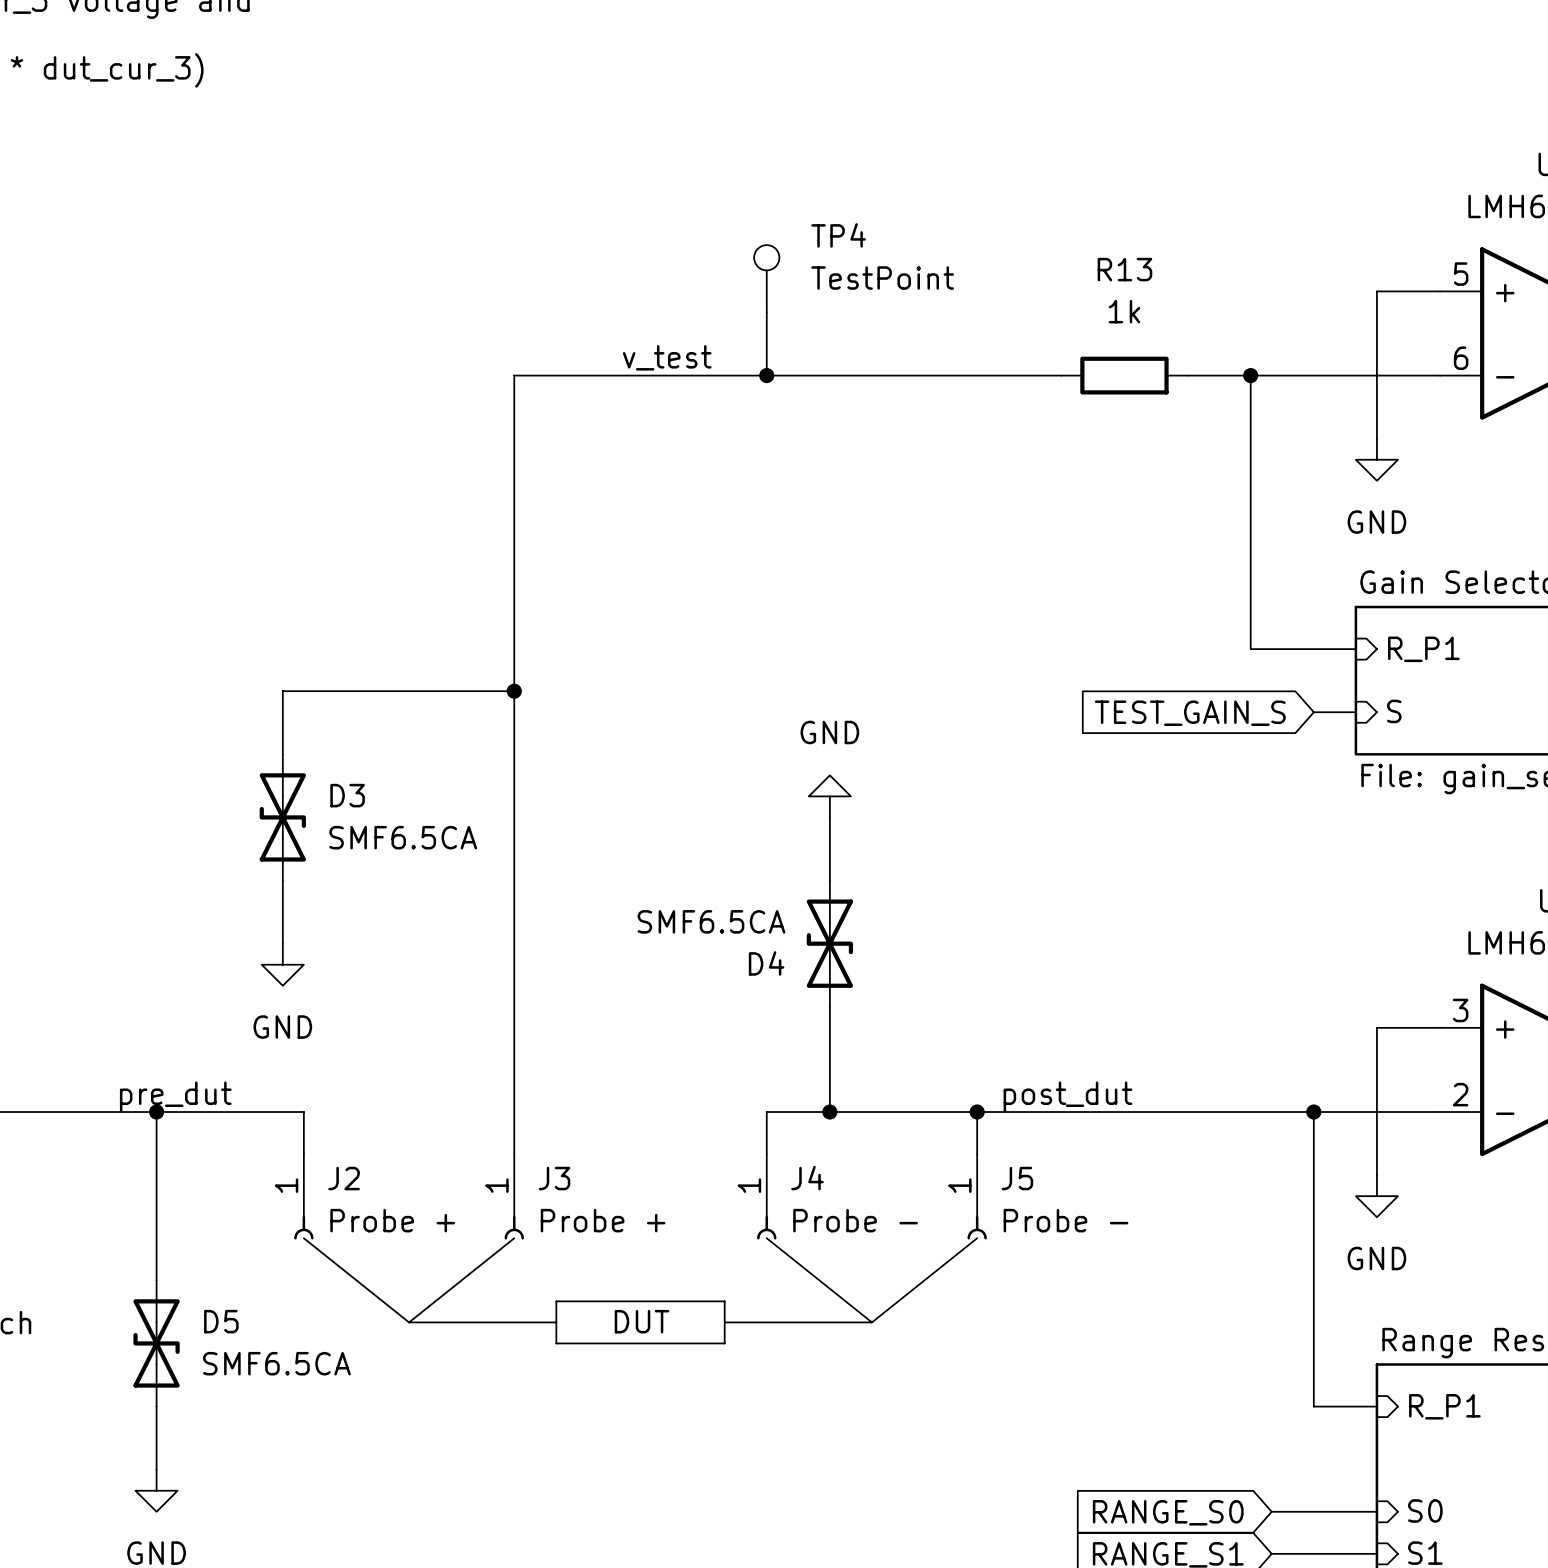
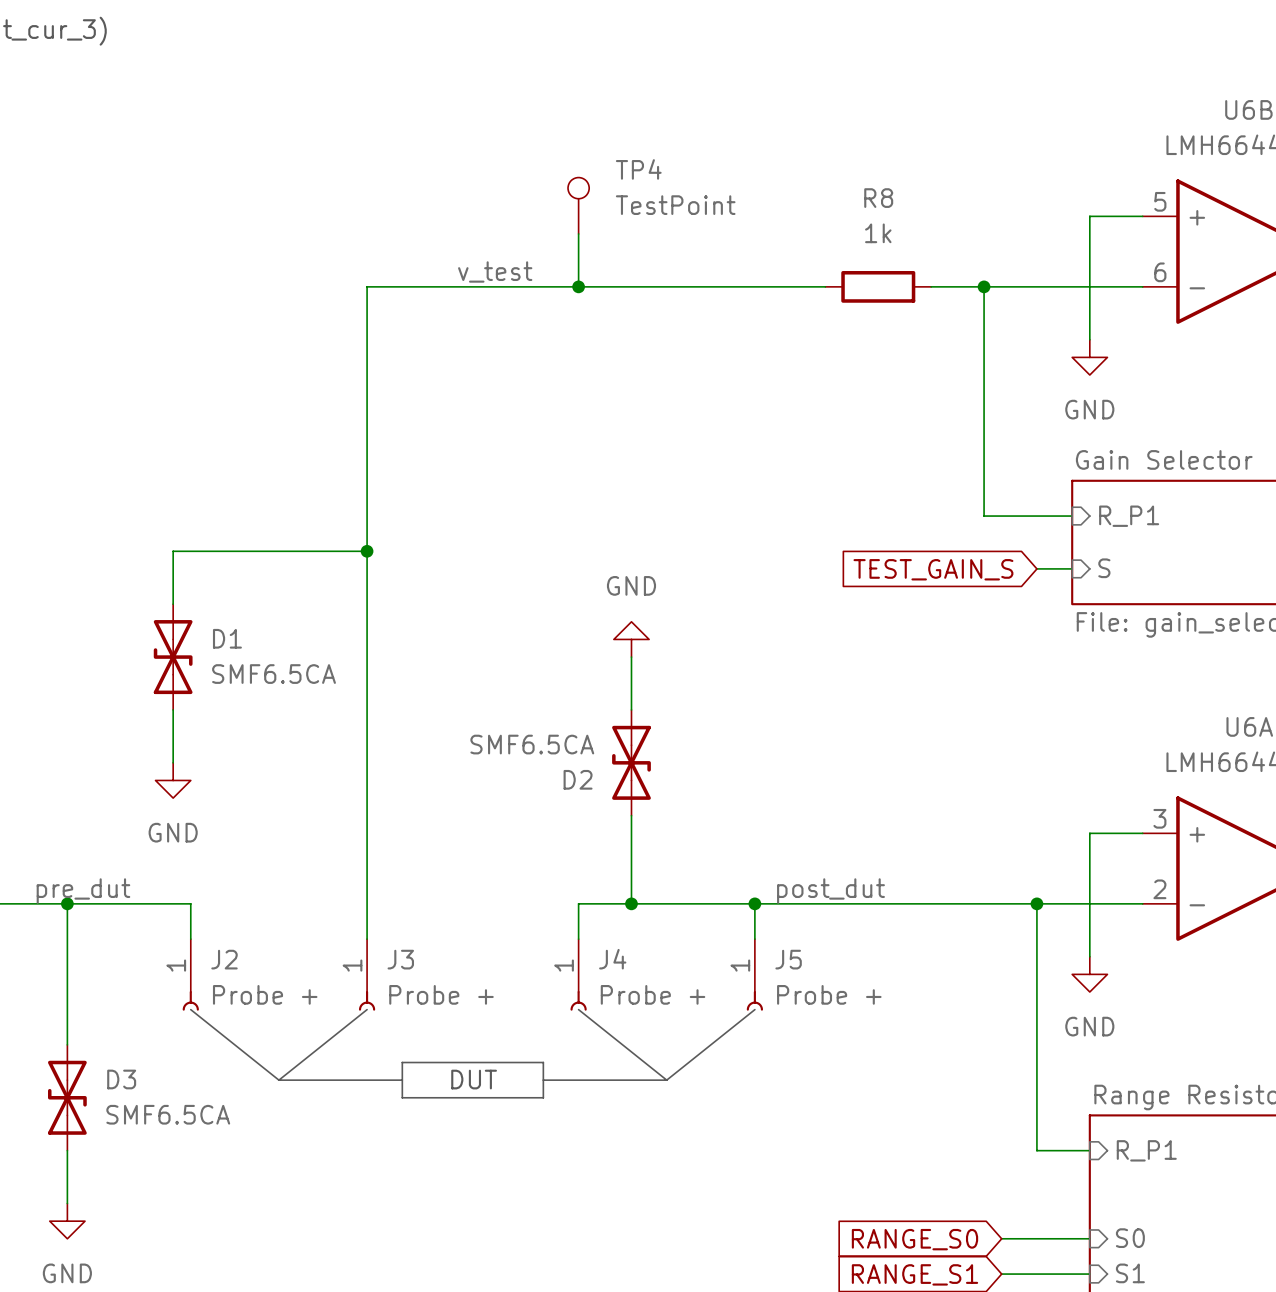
R13 name: R13 (1124, 269) -> R8 (878, 198)
D3 name: D3 (347, 795) -> D1 (227, 638)
D4 name: D4 (766, 963) -> D2 (578, 779)
J4 value: Probe - (855, 1220) -> Probe + (653, 994)
J5 value: Probe - (1066, 1220) -> Probe + (829, 994)
D5 name: D5 (221, 1321) -> D3 (121, 1079)

